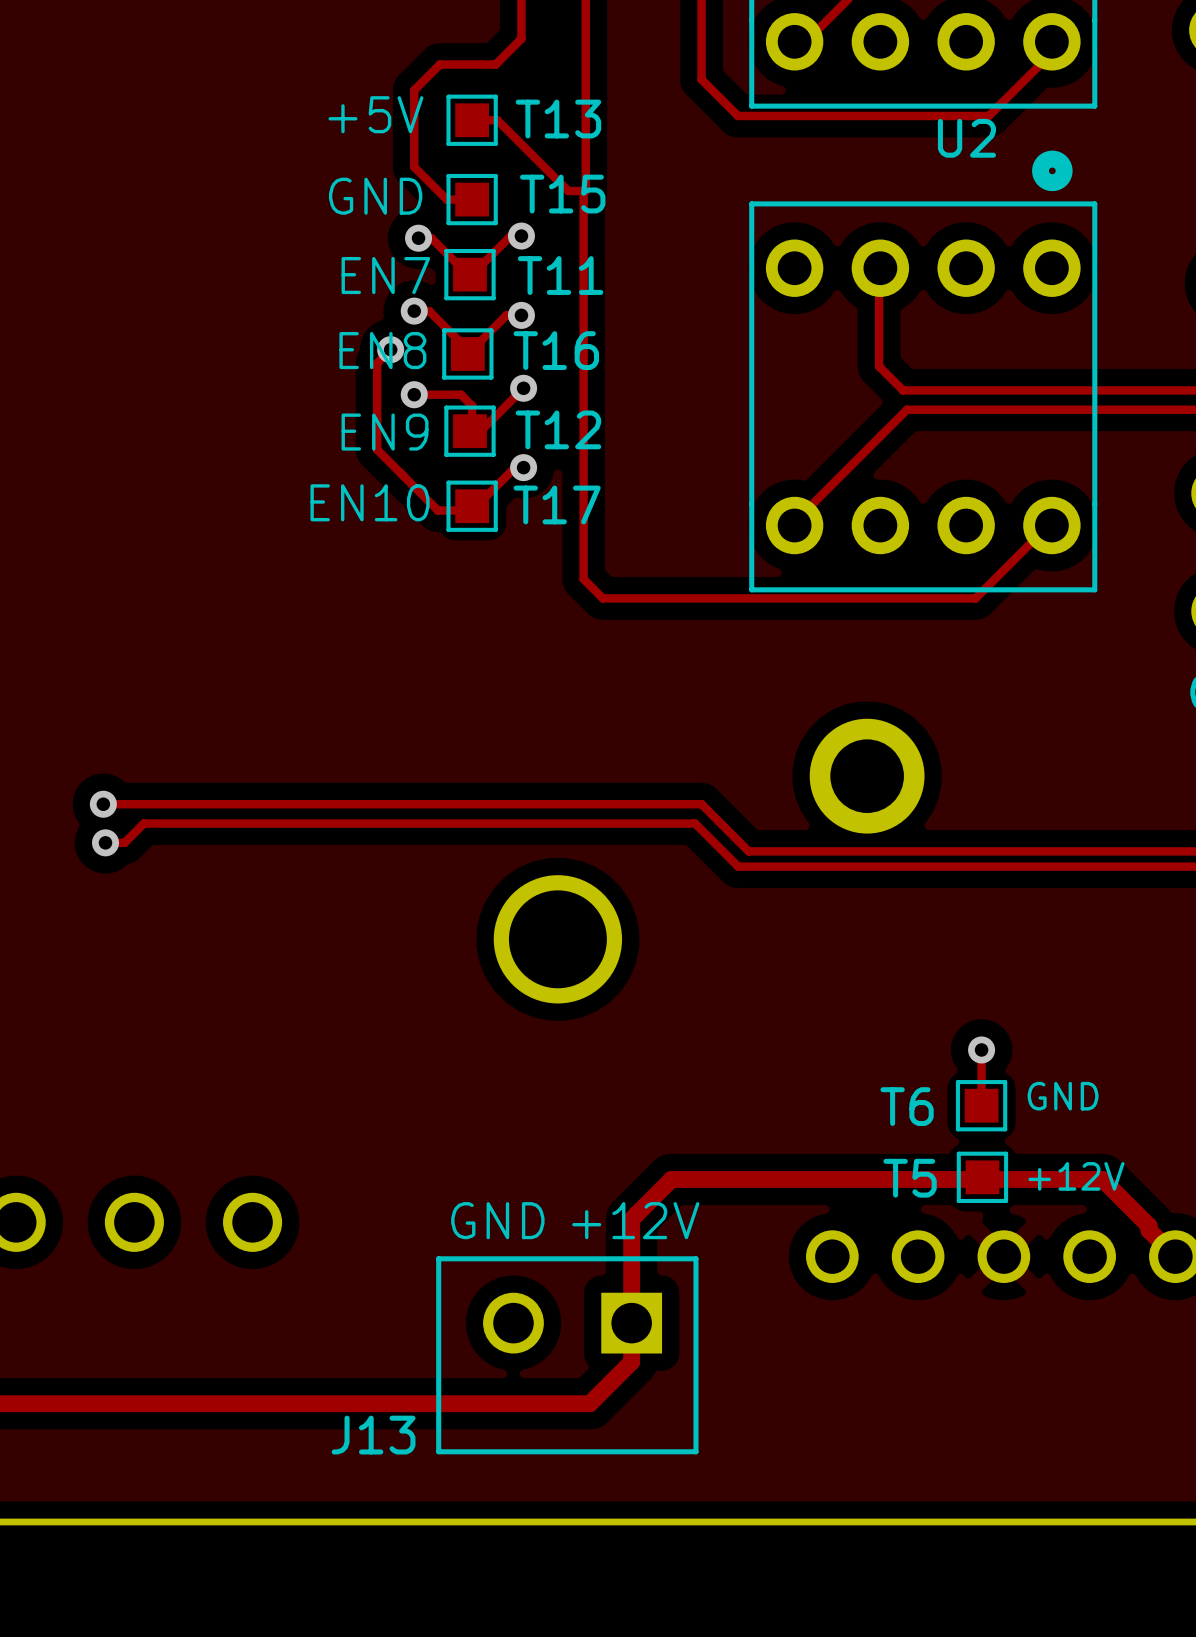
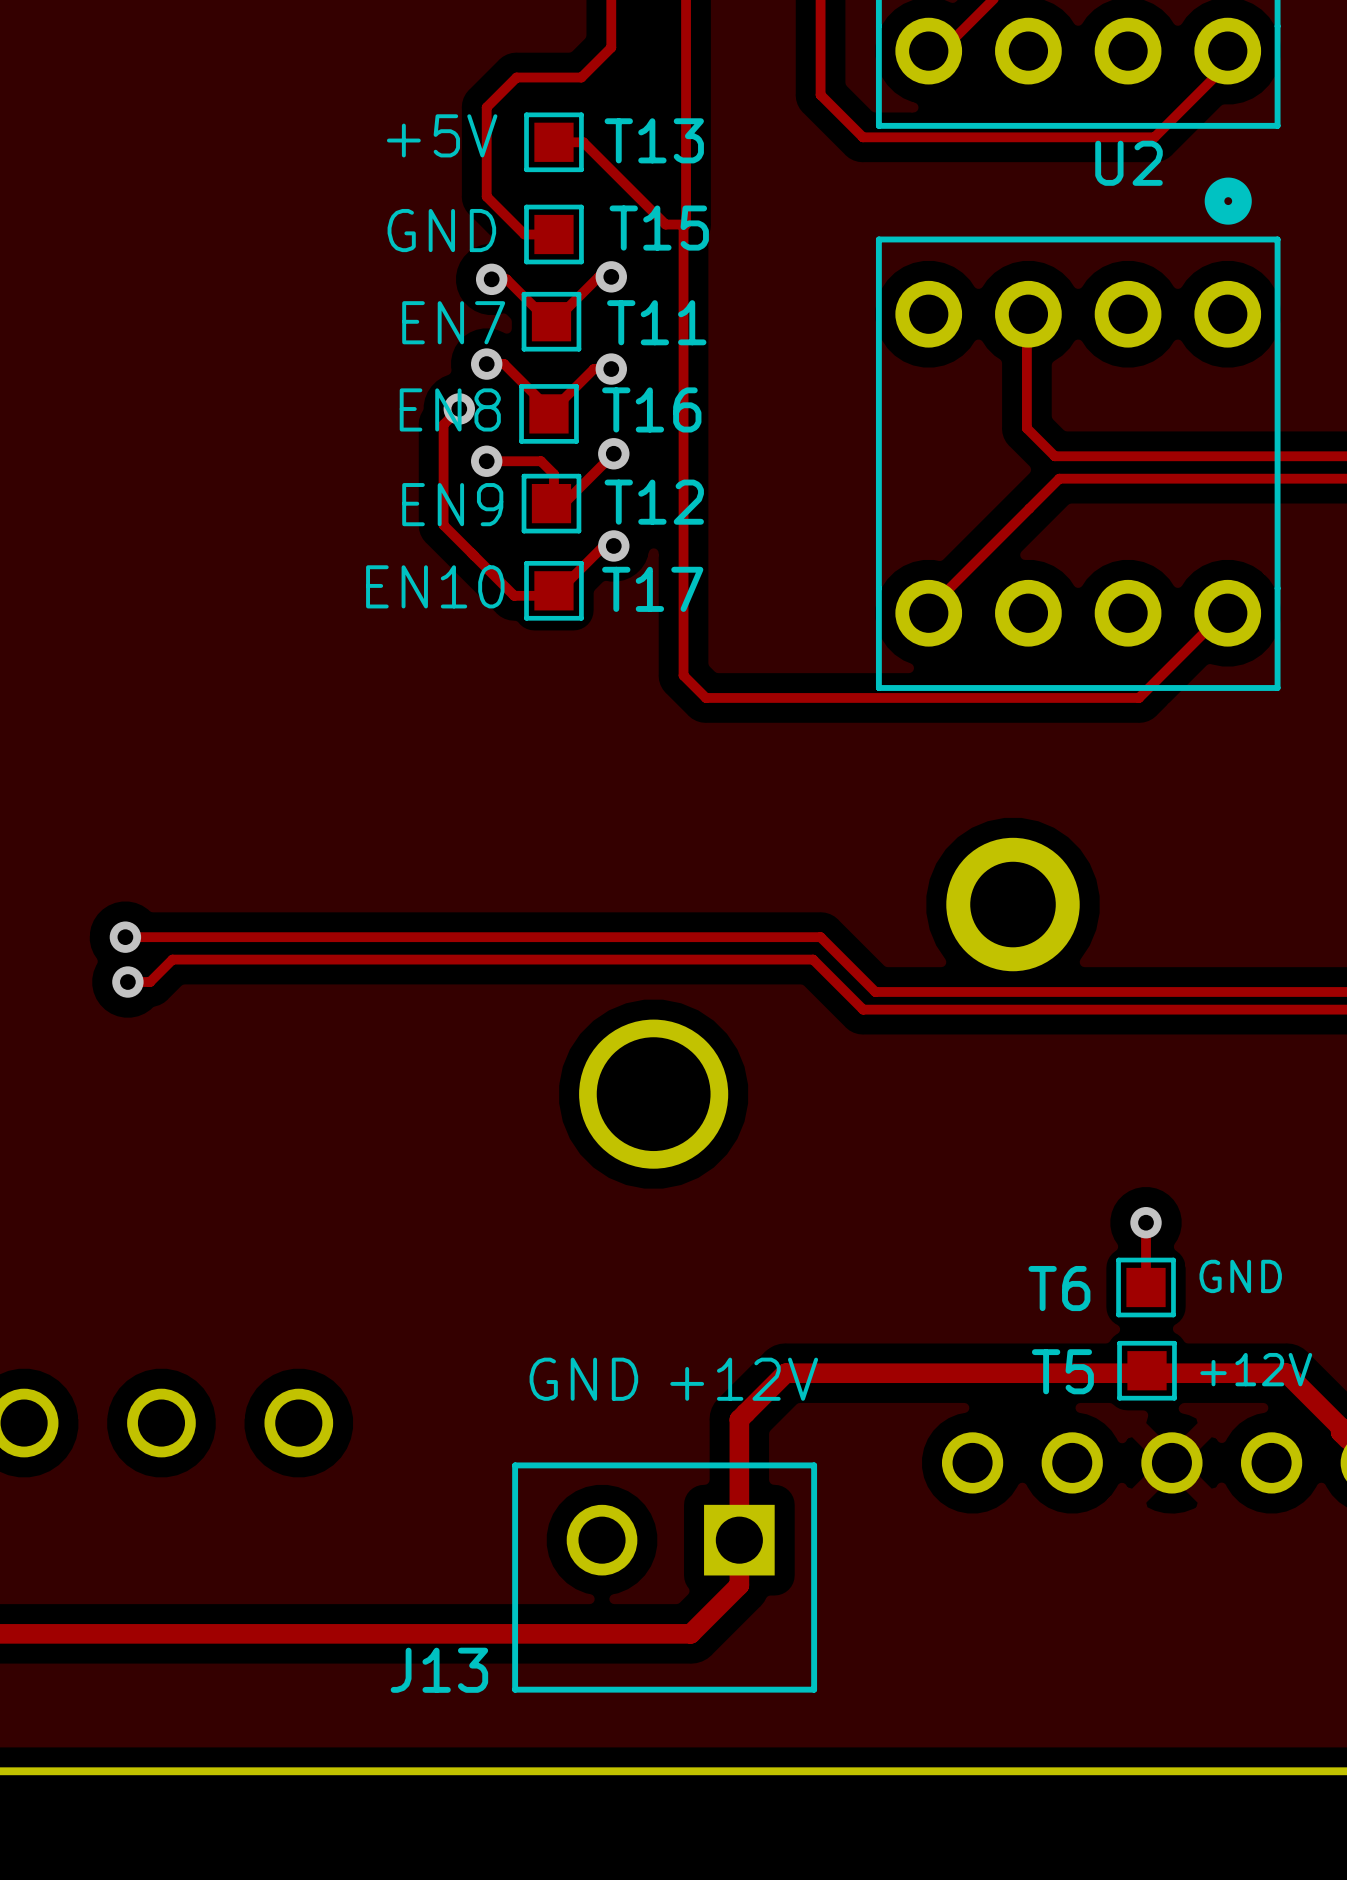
text position: GND (497, 1220) -> GND (583, 1379)
text position: +12V (635, 1220) -> +12V (744, 1379)

